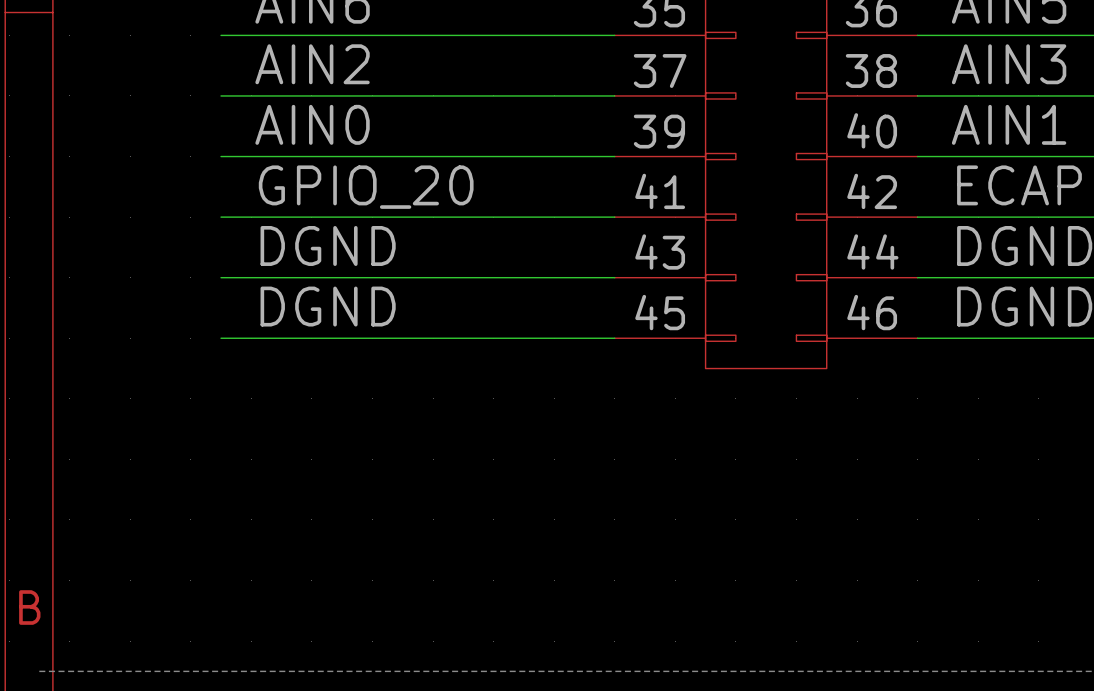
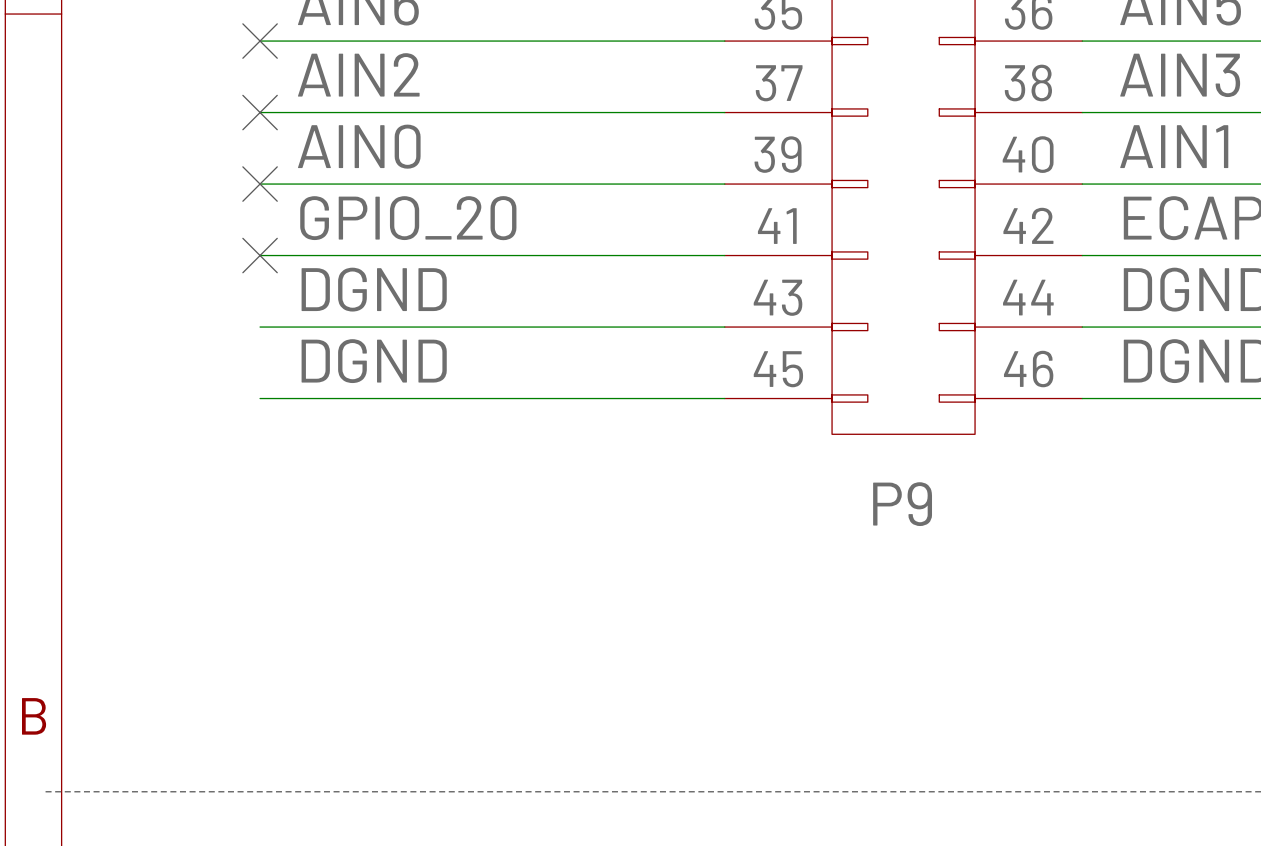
no-connect mark: none -> (260, 41)
no-connect mark: none -> (260, 112)
no-connect mark: none -> (260, 184)
no-connect mark: none -> (260, 255)
label: none -> P9 (902, 504)

